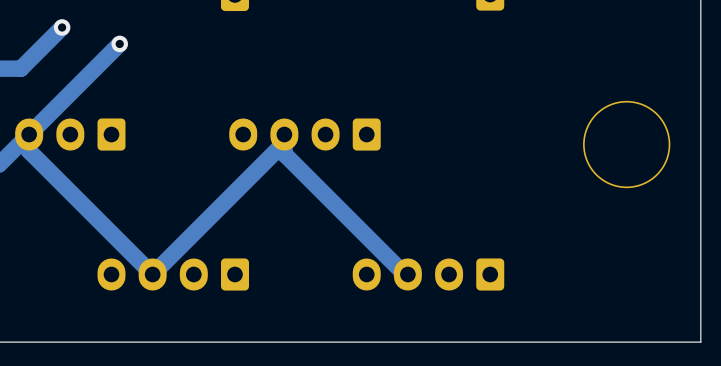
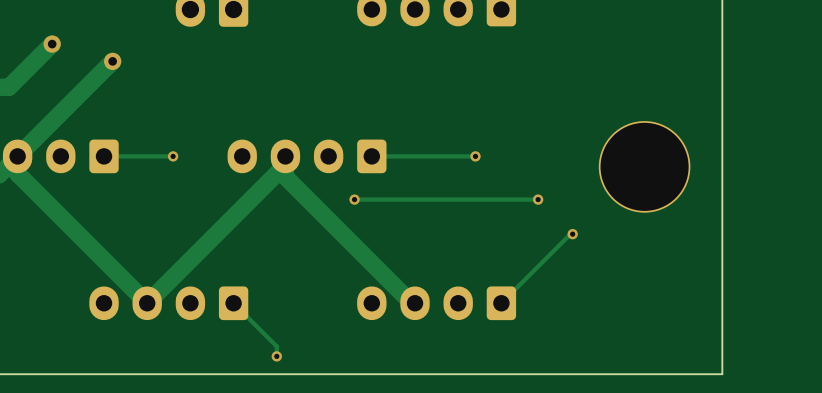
track: none -> (173, 156) (104, 156)
via: none -> (173, 156)
track: none -> (475, 156) (371, 156)
via: none -> (475, 156)
via: none -> (354, 199)
track: none -> (538, 199) (354, 199)
via: none -> (538, 199)
track: none -> (572, 234) (570, 234) (501, 303)
via: none -> (572, 234)
track: none -> (233, 303) (276, 346) (276, 356)
via: none -> (276, 356)

